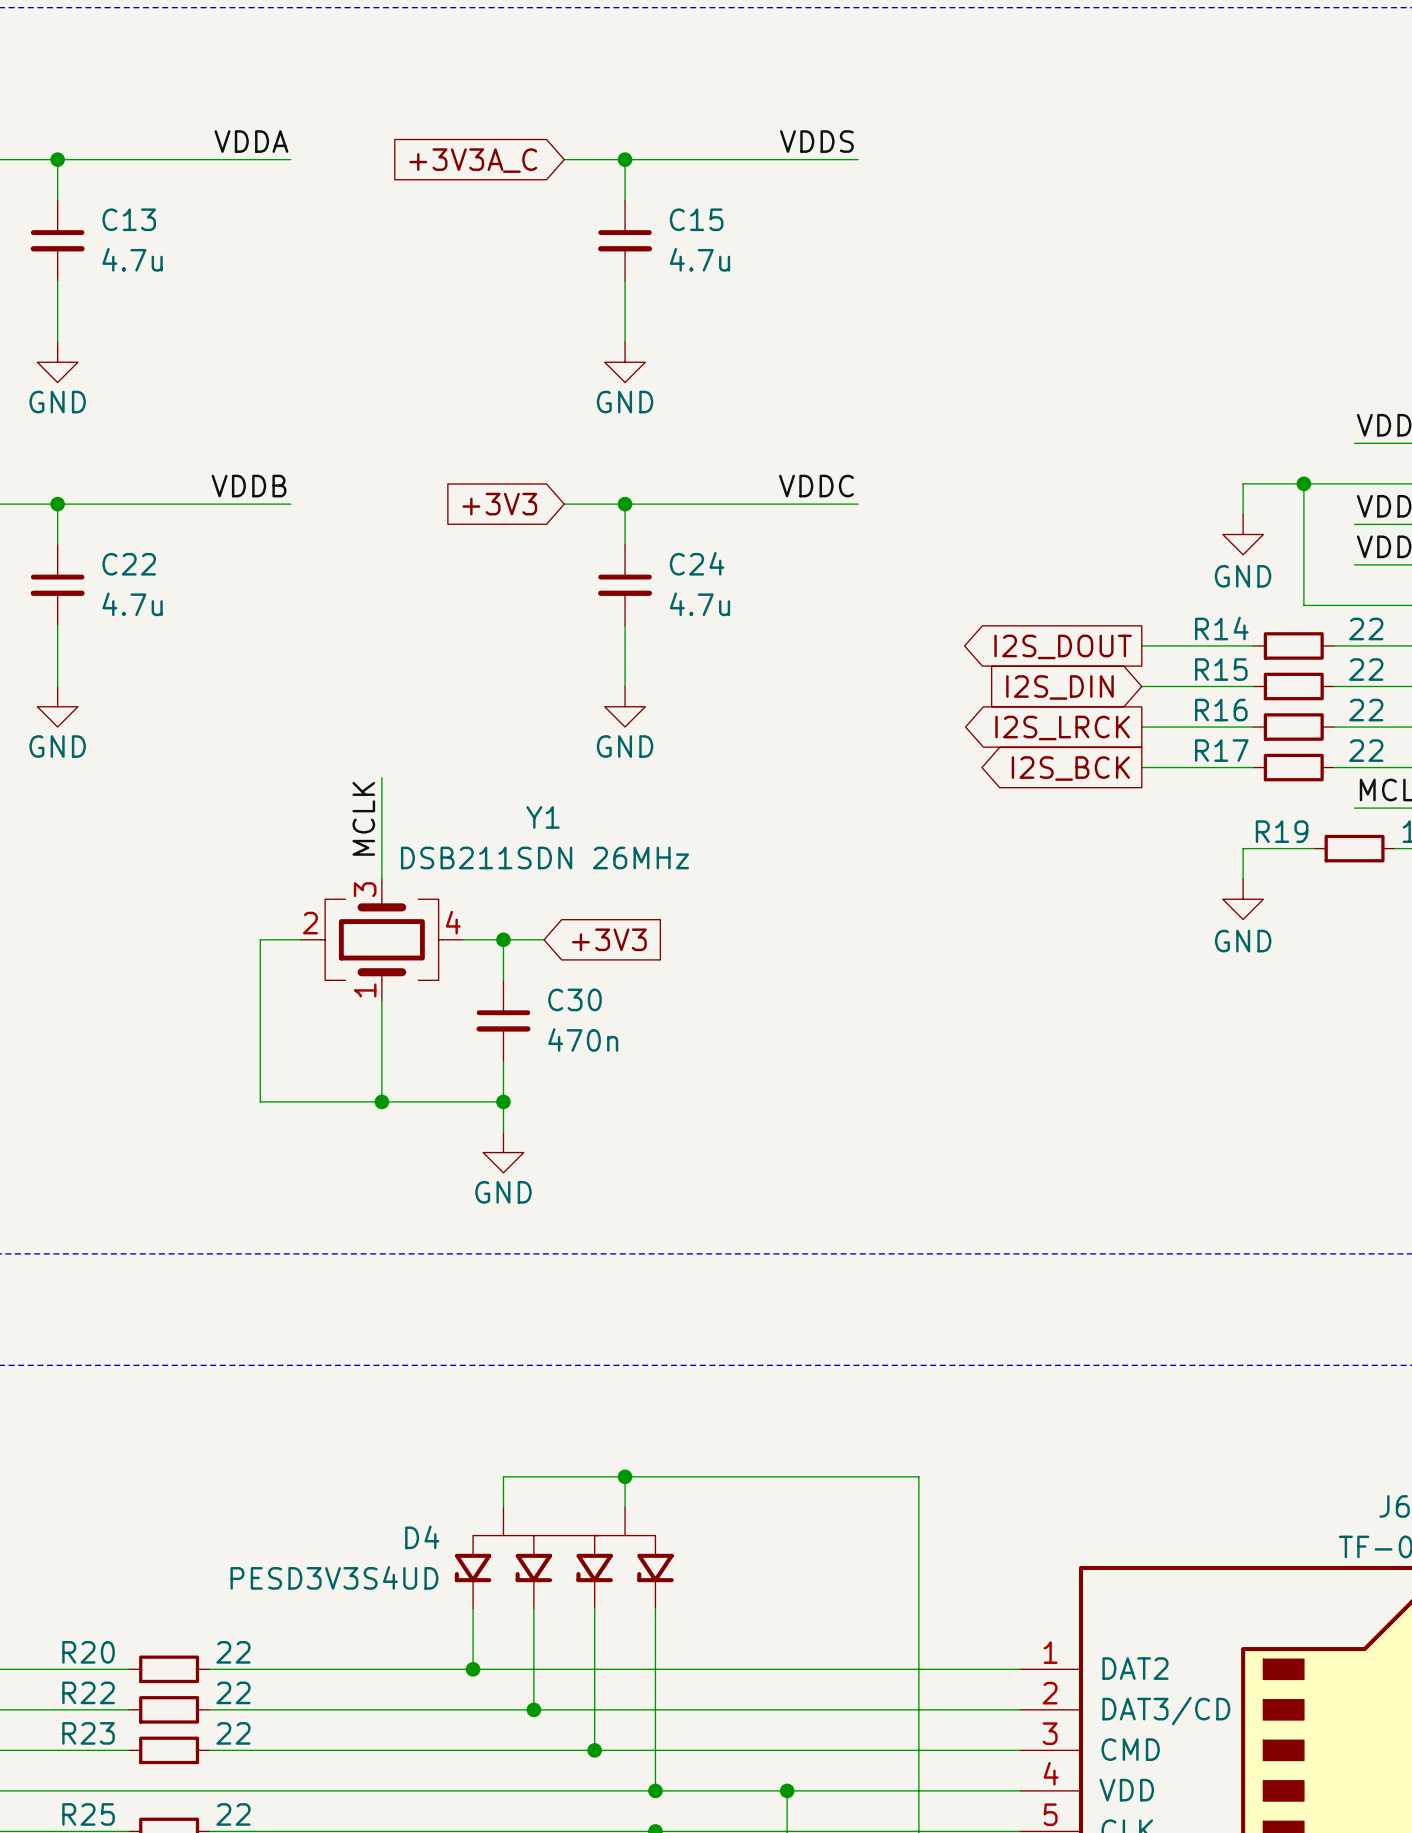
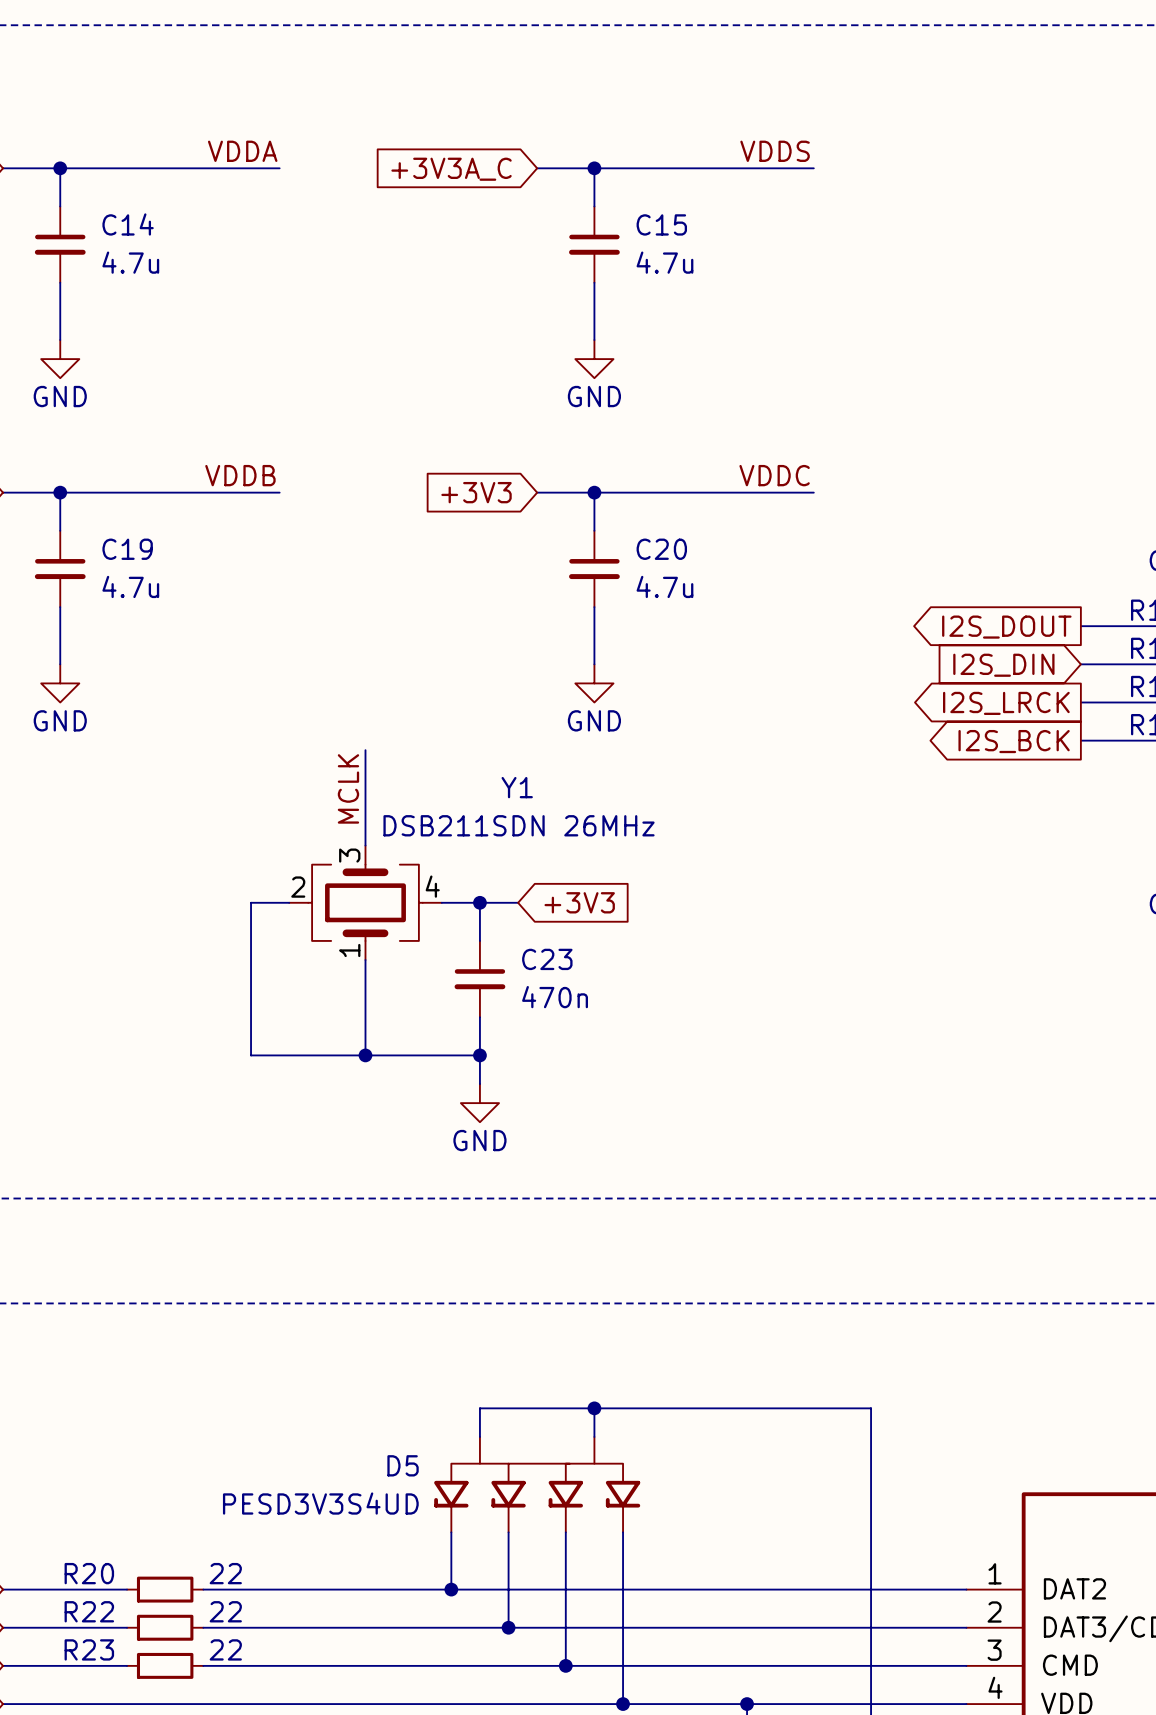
C13 name: C13 (129, 219) -> C14 (128, 224)
C24 name: C24 (697, 563) -> C20 (661, 549)
C22 name: C22 (129, 564) -> C19 (127, 549)
C30 name: C30 (575, 999) -> C23 (547, 959)
D4 name: D4 (422, 1537) -> D5 (403, 1465)

